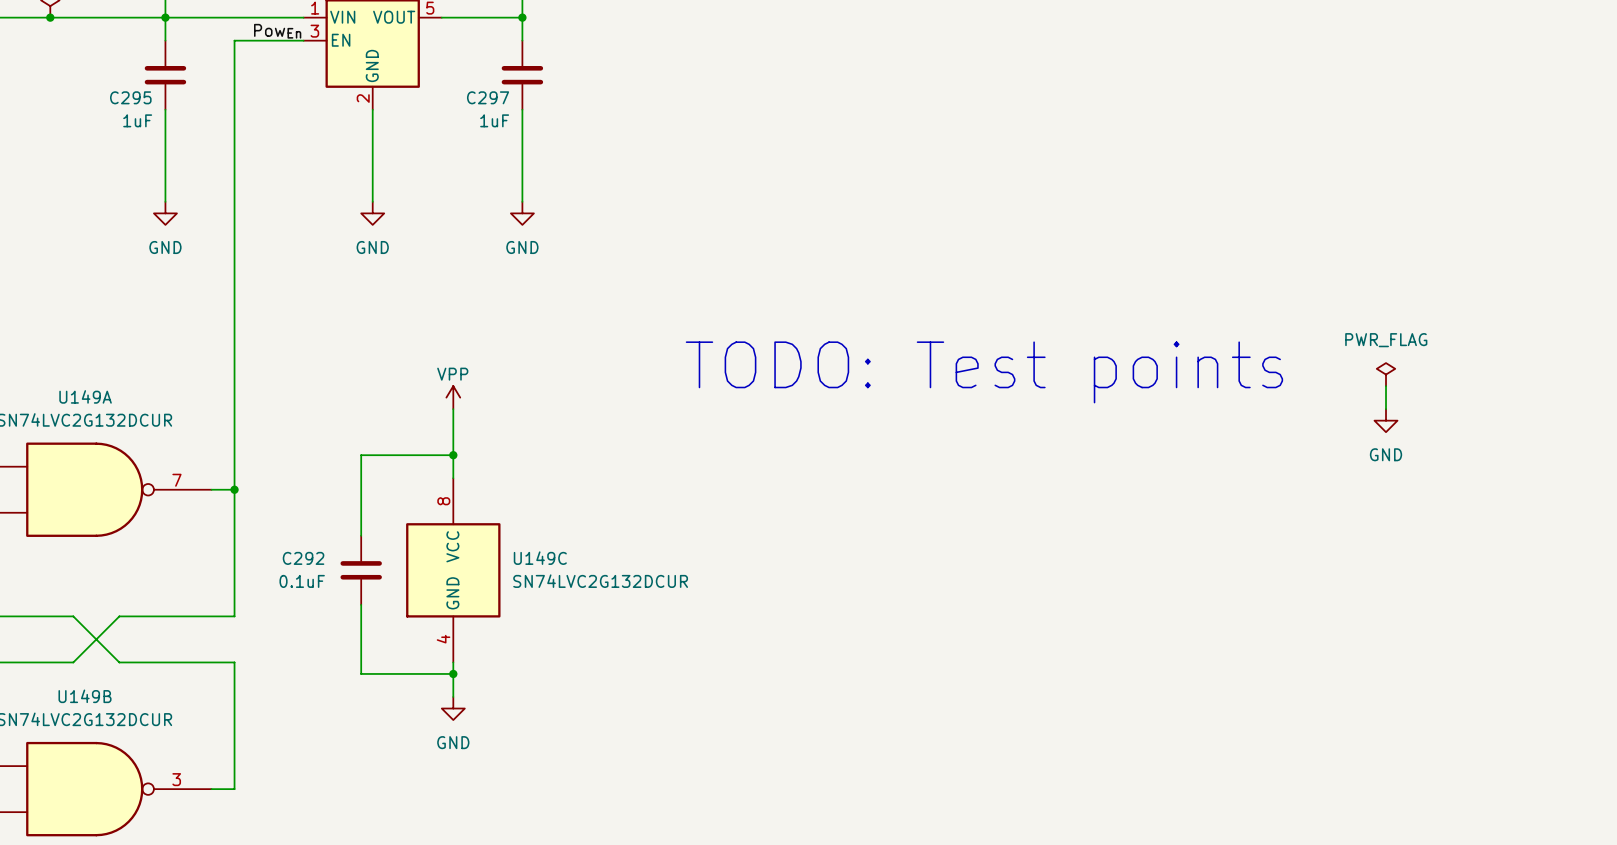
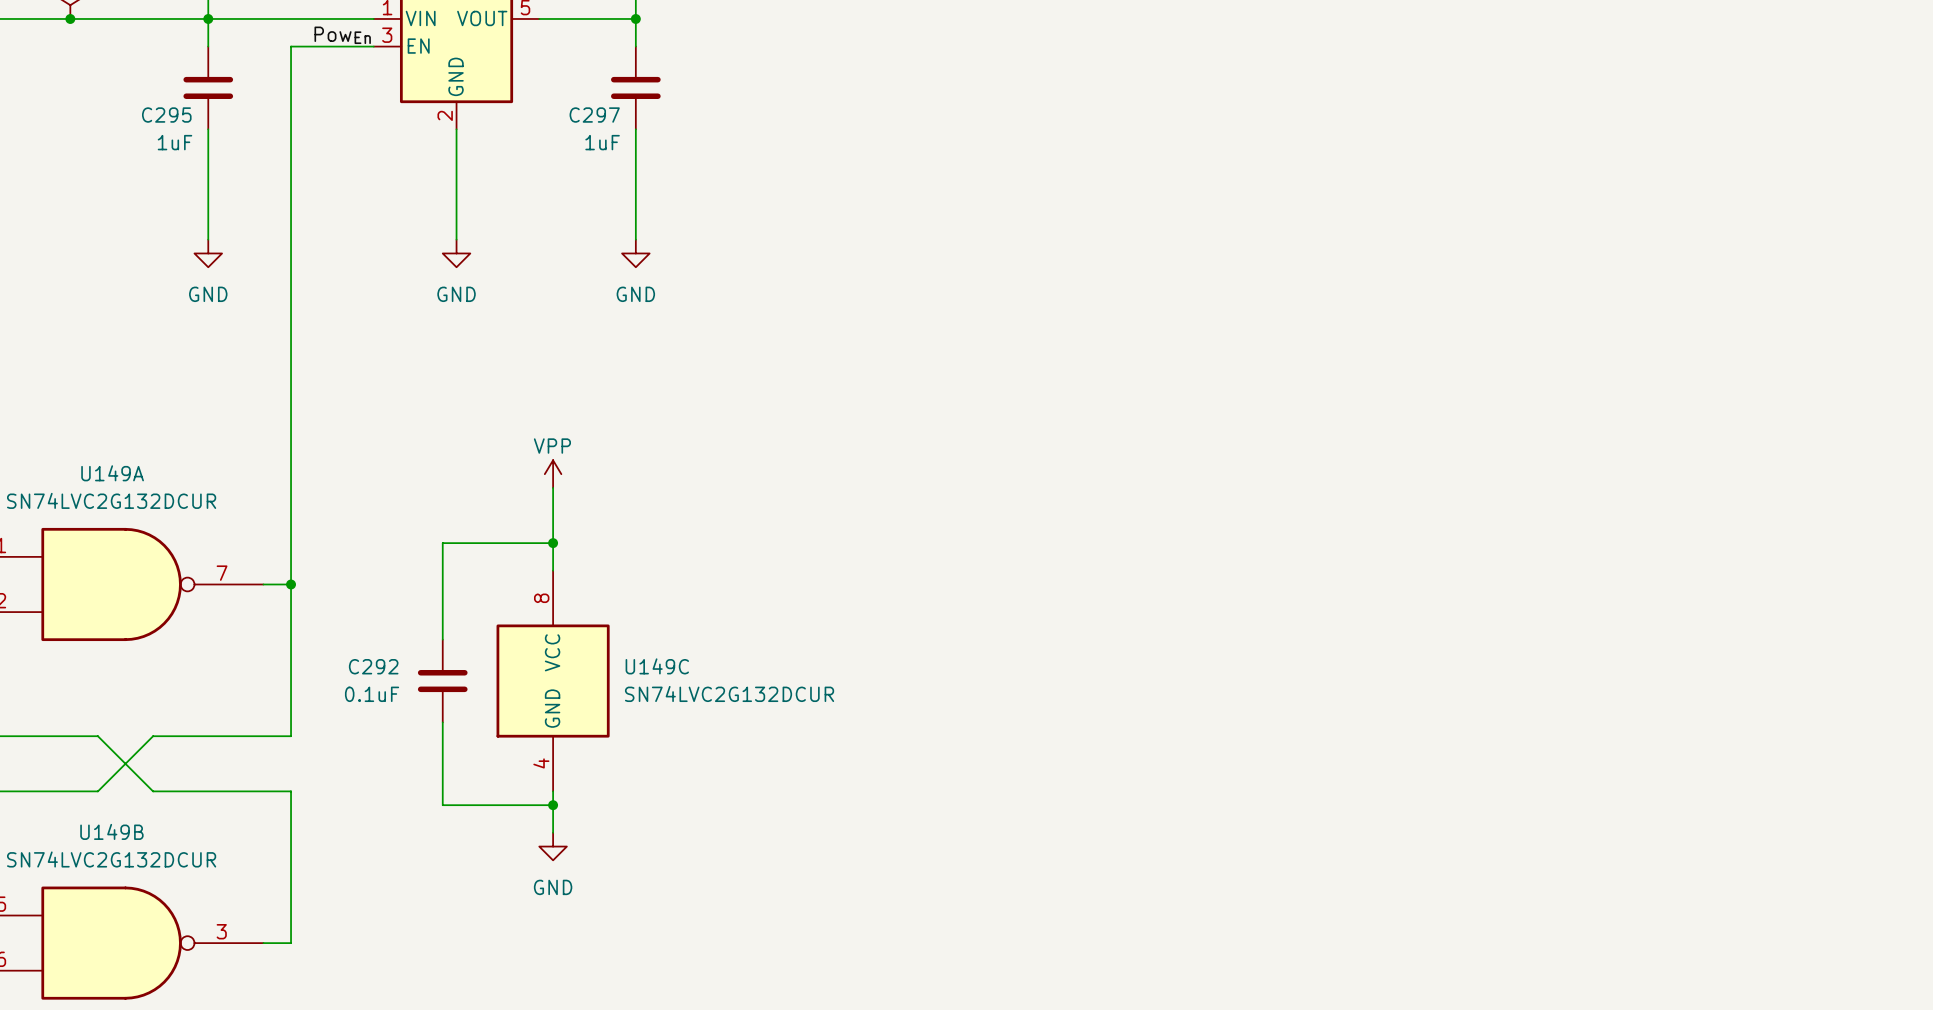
text: TODO: Test points (984, 372) -> none
power symbol: PWR_FLAG (1386, 374) -> none
wire: (1386, 386) (1386, 409) -> none
power symbol: GND (1386, 420) -> none

